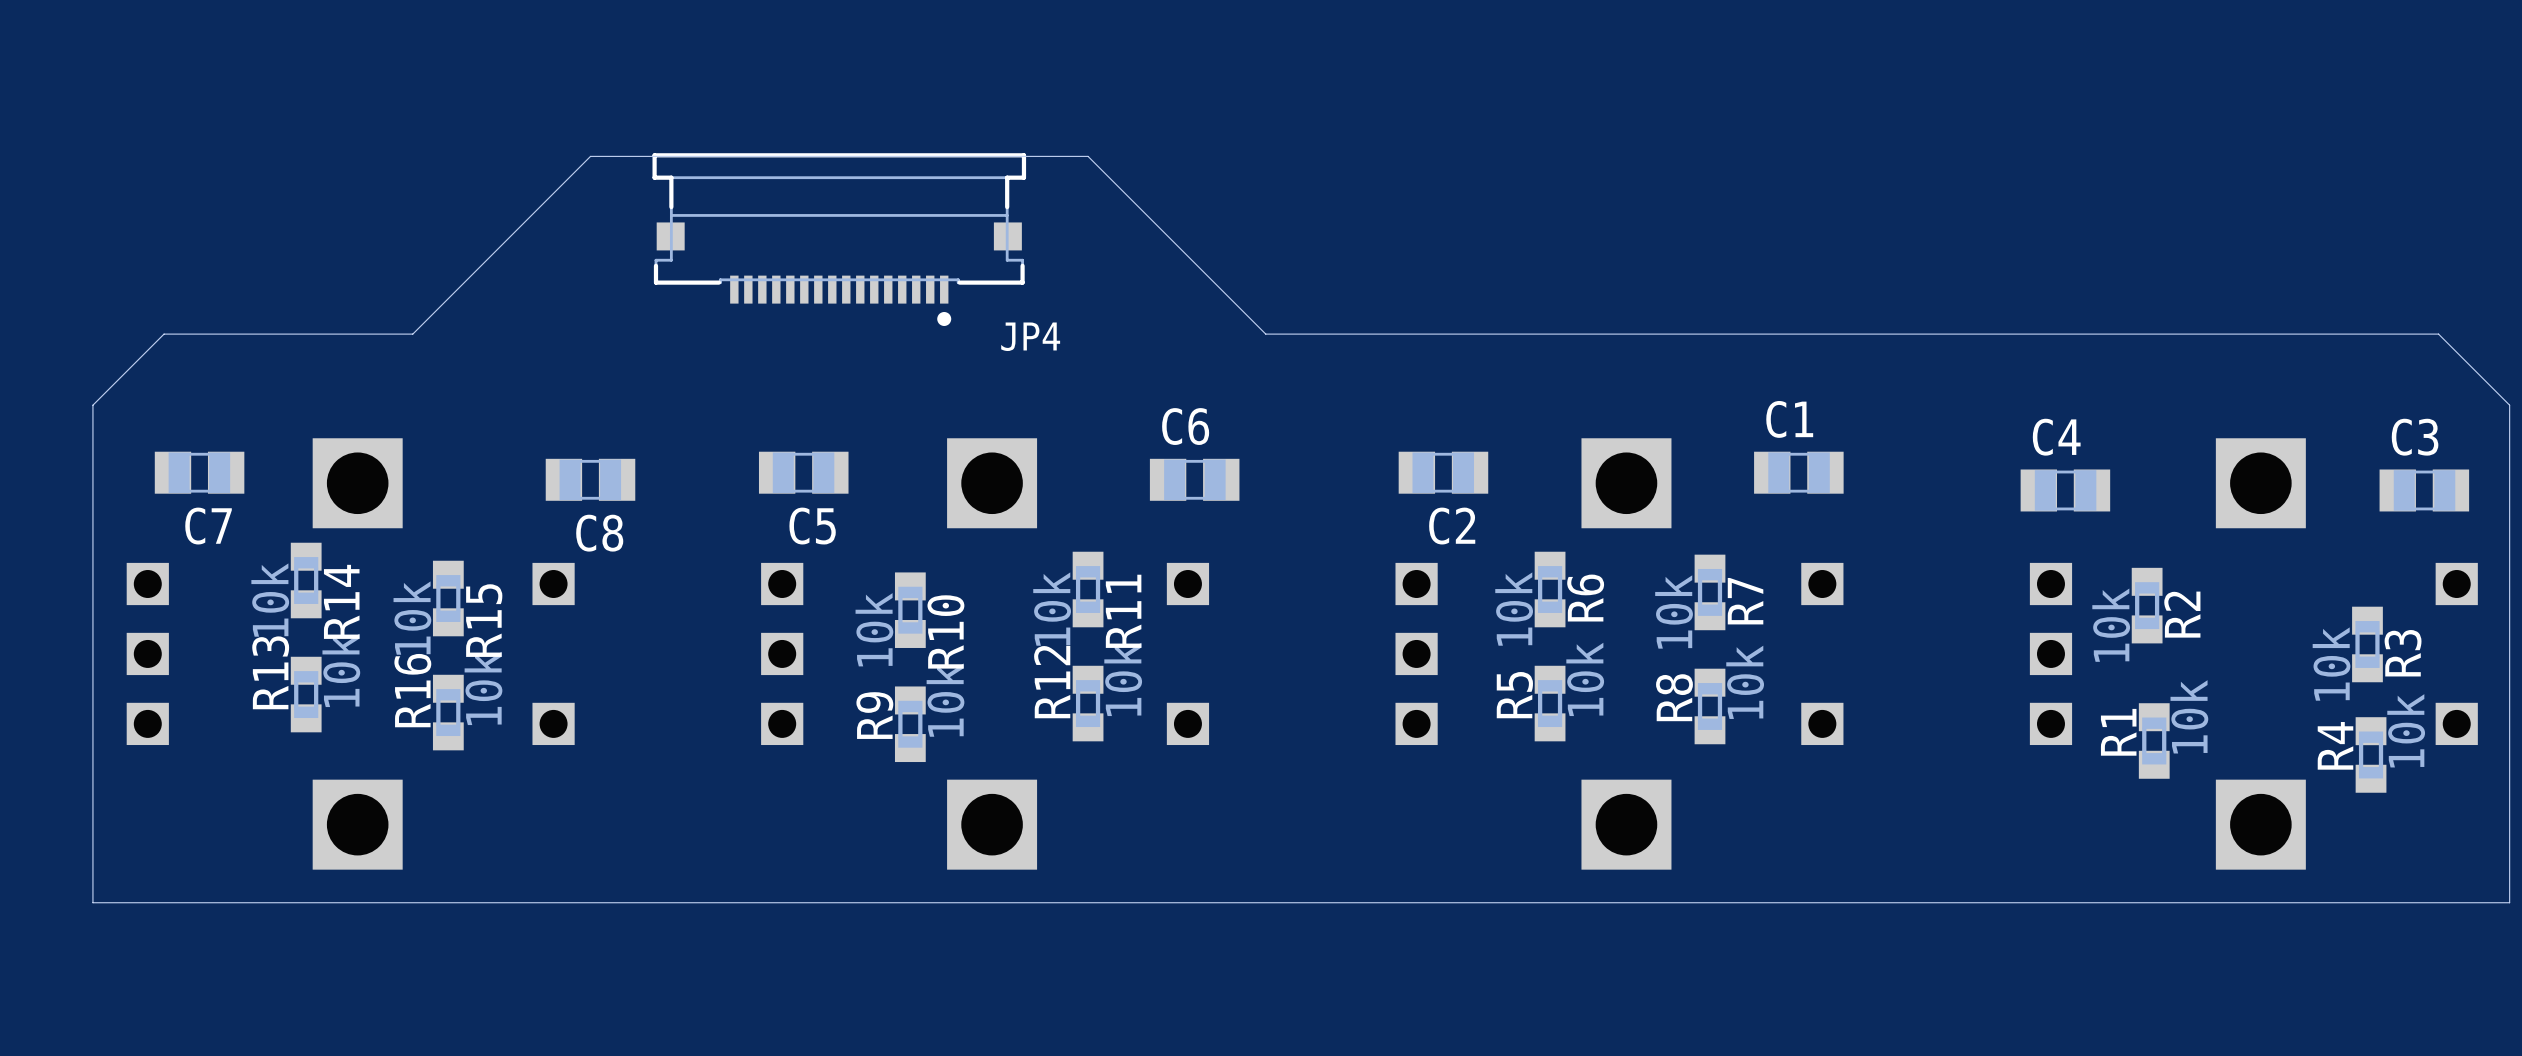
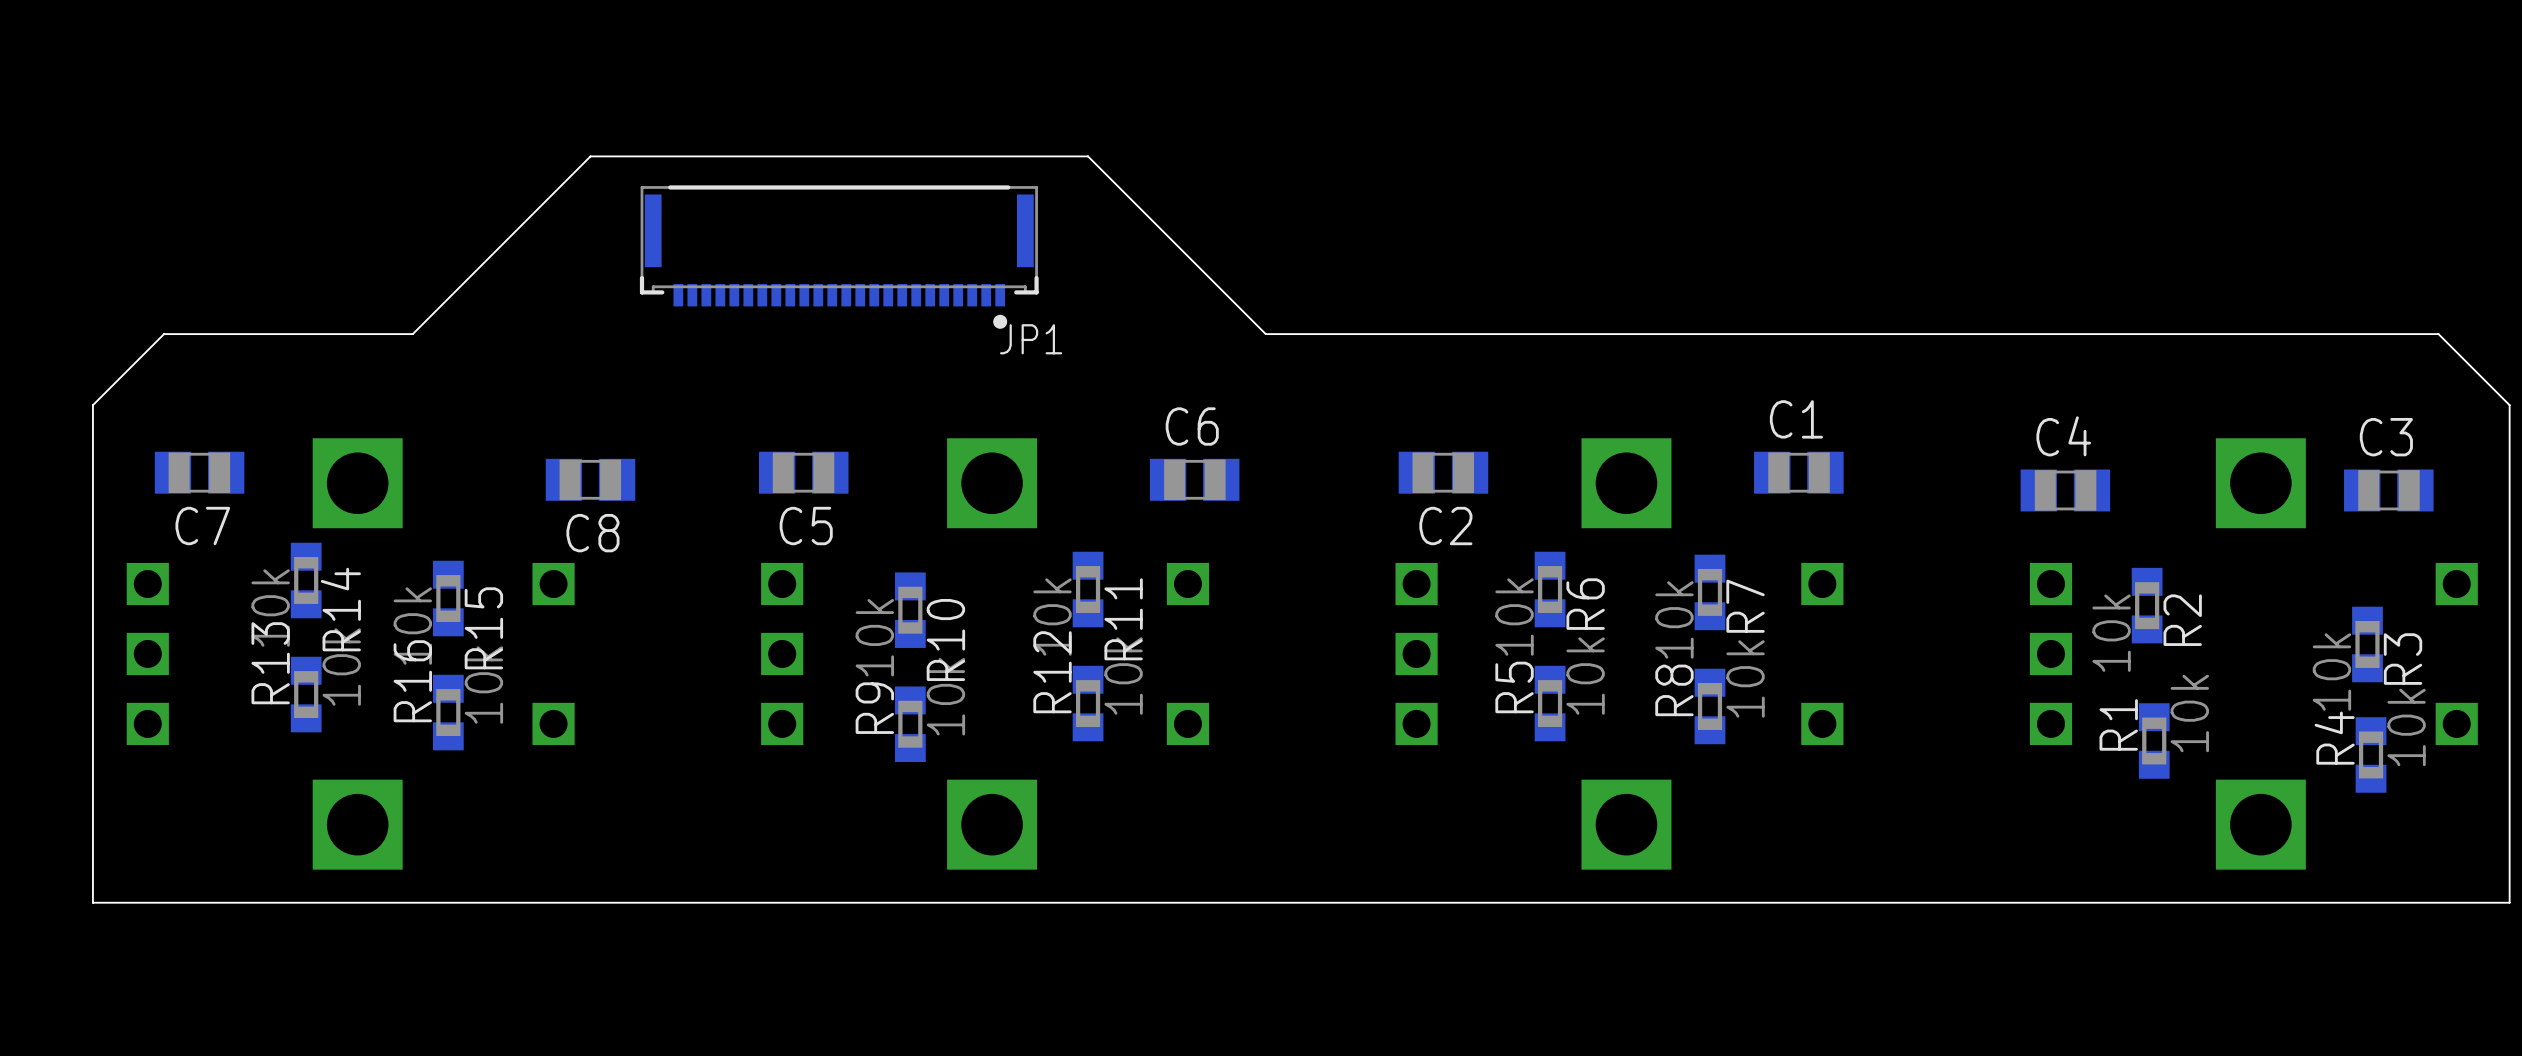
JP4: (839, 239) -> none
JP1: none -> (839, 257)
C3 position: (2424, 490) -> (2388, 490)

